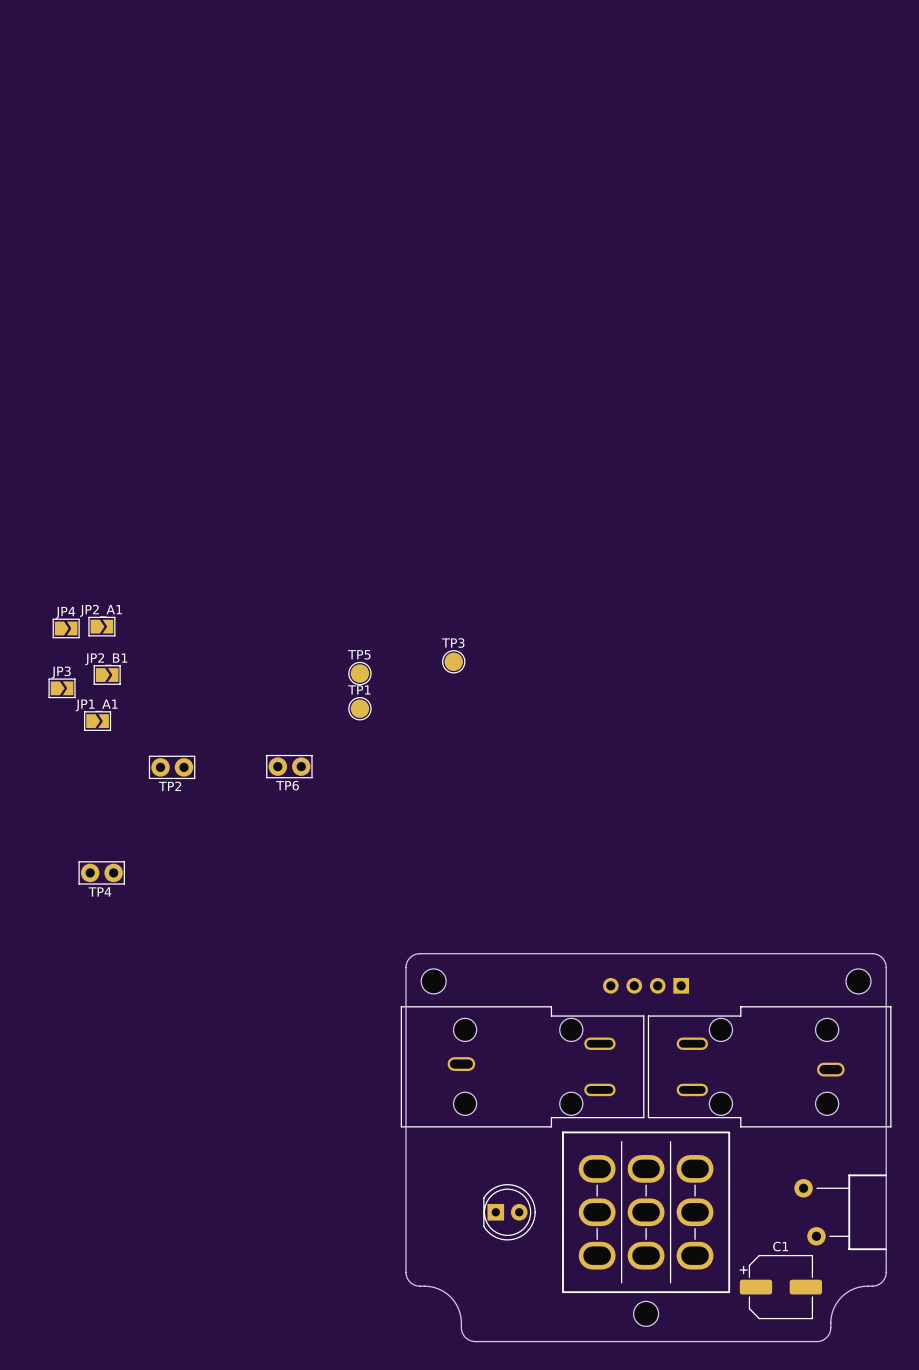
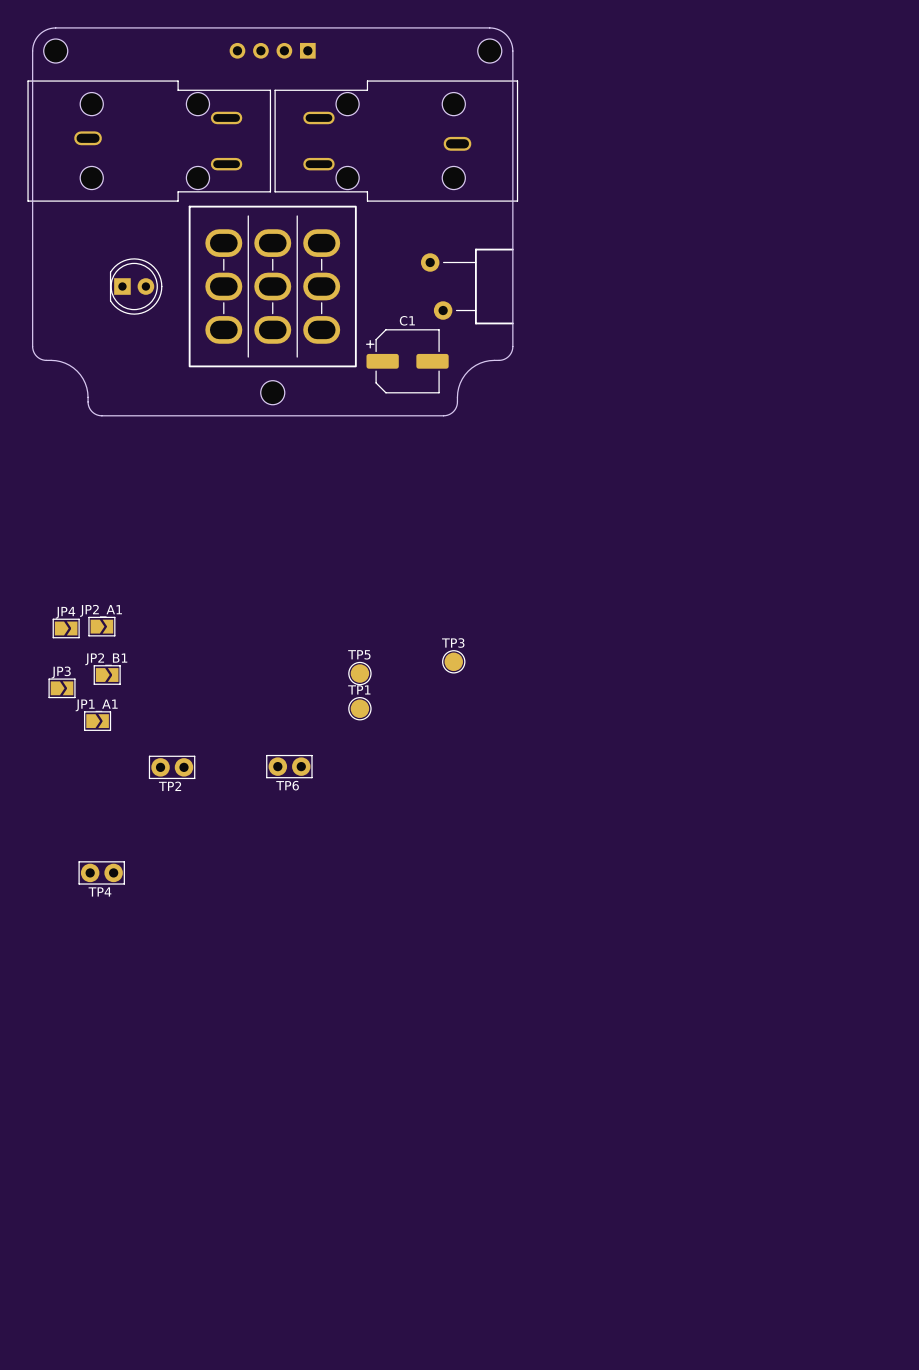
board edge: none -> (489, 27) (55, 27) (41, 32) (34, 41) (32, 51) (32, 346) (35, 354) (42, 359) (65, 363) (77, 371) (86, 387) (89, 408) (100, 415) (443, 415) (452, 412) (456, 405) (460, 383) (468, 371) (484, 361) (505, 358) (512, 348) (512, 48) (506, 34) (497, 29) (489, 27)
part: none -> (272, 50)
part: none -> (55, 51)
part: none -> (489, 51)
part: none -> (149, 141)
part: none -> (396, 141)
part: none -> (136, 286)
part: none -> (272, 286)
part: none -> (467, 286)
part: none -> (272, 392)
board edge: (872, 953) (419, 953) (411, 956) (405, 967) (405, 1272) (408, 1280) (416, 1285) (438, 1288) (450, 1296) (460, 1313) (463, 1334) (473, 1341) (816, 1341) (825, 1338) (830, 1331) (833, 1308) (841, 1296) (858, 1287) (879, 1284) (886, 1274) (886, 967) (882, 957) (872, 953) -> none
part: (433, 981) -> none
part: (858, 981) -> none
part: (646, 985) -> none
part: (522, 1066) -> none
part: (769, 1066) -> none
part: (509, 1212) -> none
part: (646, 1212) -> none
part: (840, 1212) -> none
C1 position: (780, 1287) -> (407, 361)
part: (646, 1313) -> none

